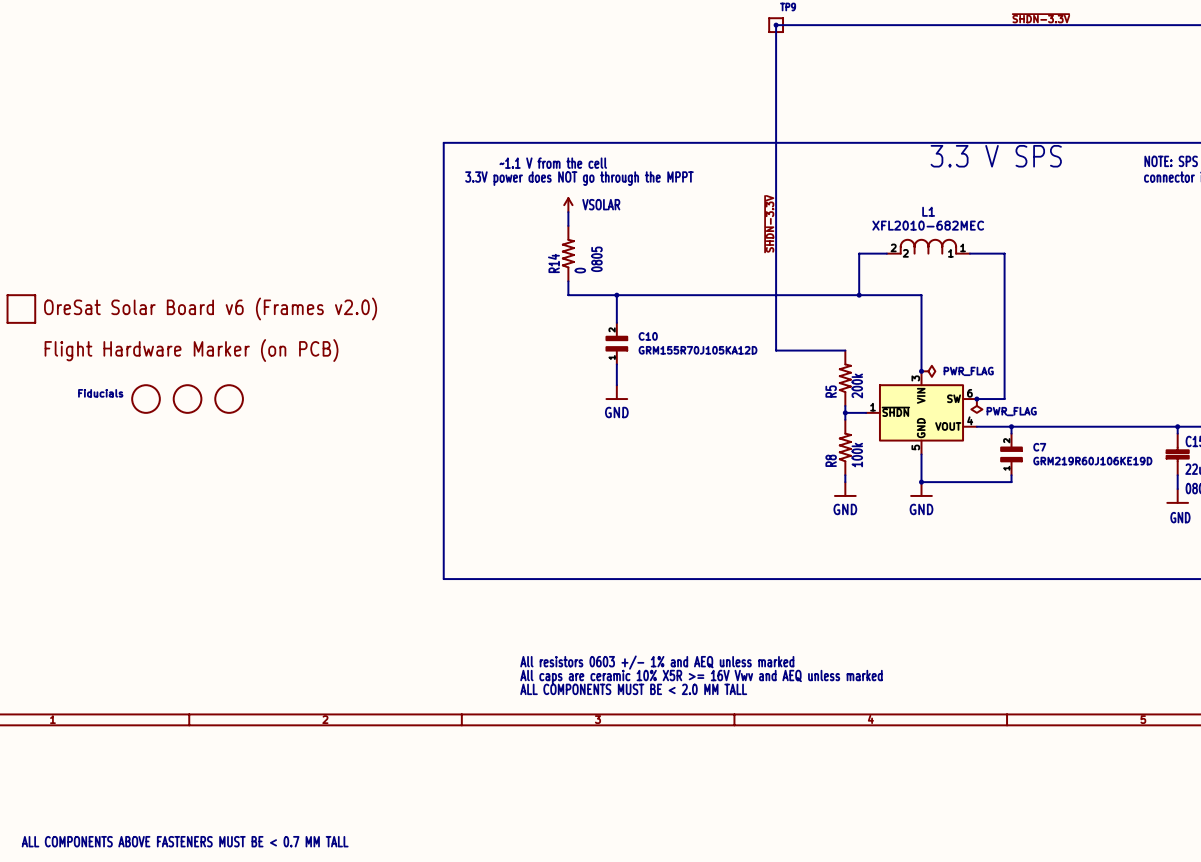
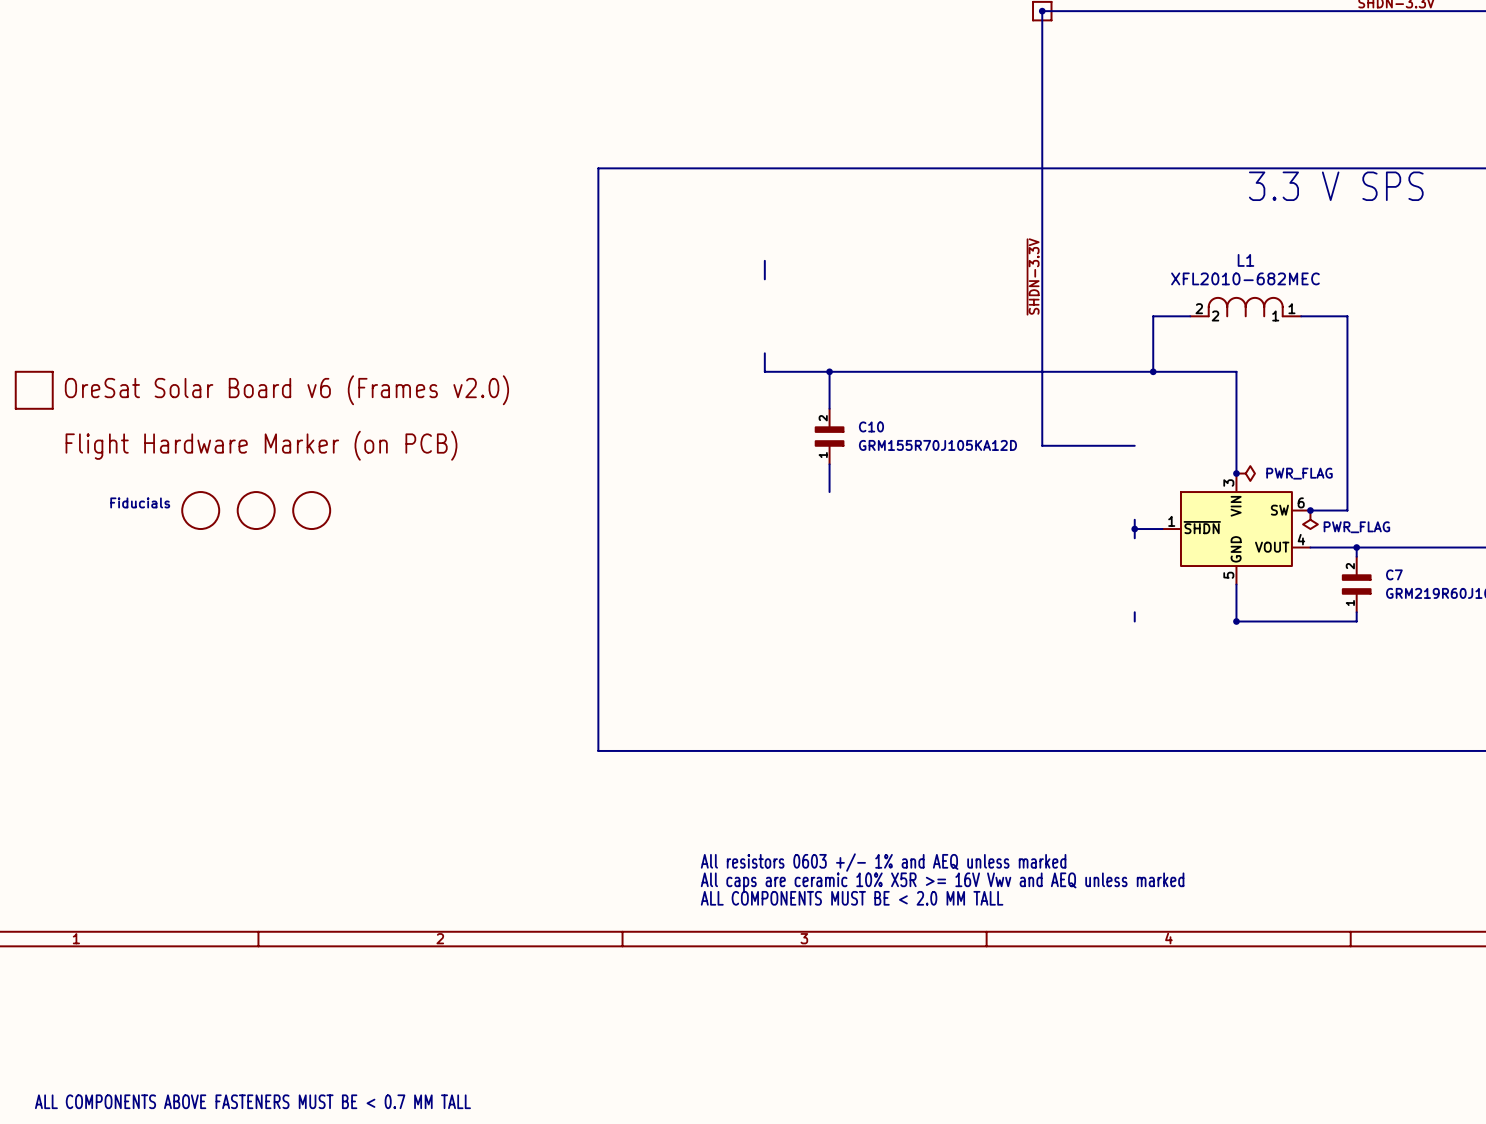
text: ~1.1 V from the cell (553, 163) -> none
text: 3.3V power does NOT go through the MPPT (579, 178) -> none
power symbol: VSOLAR (568, 204) -> none
R14: 0 (568, 253) -> none
text: 0805 (596, 259) -> none
R5: 200k (845, 378) -> none
power symbol: GND (616, 392) -> none
R8: 100k (845, 447) -> none
power symbol: GND (845, 489) -> none
power symbol: GND (921, 489) -> none

